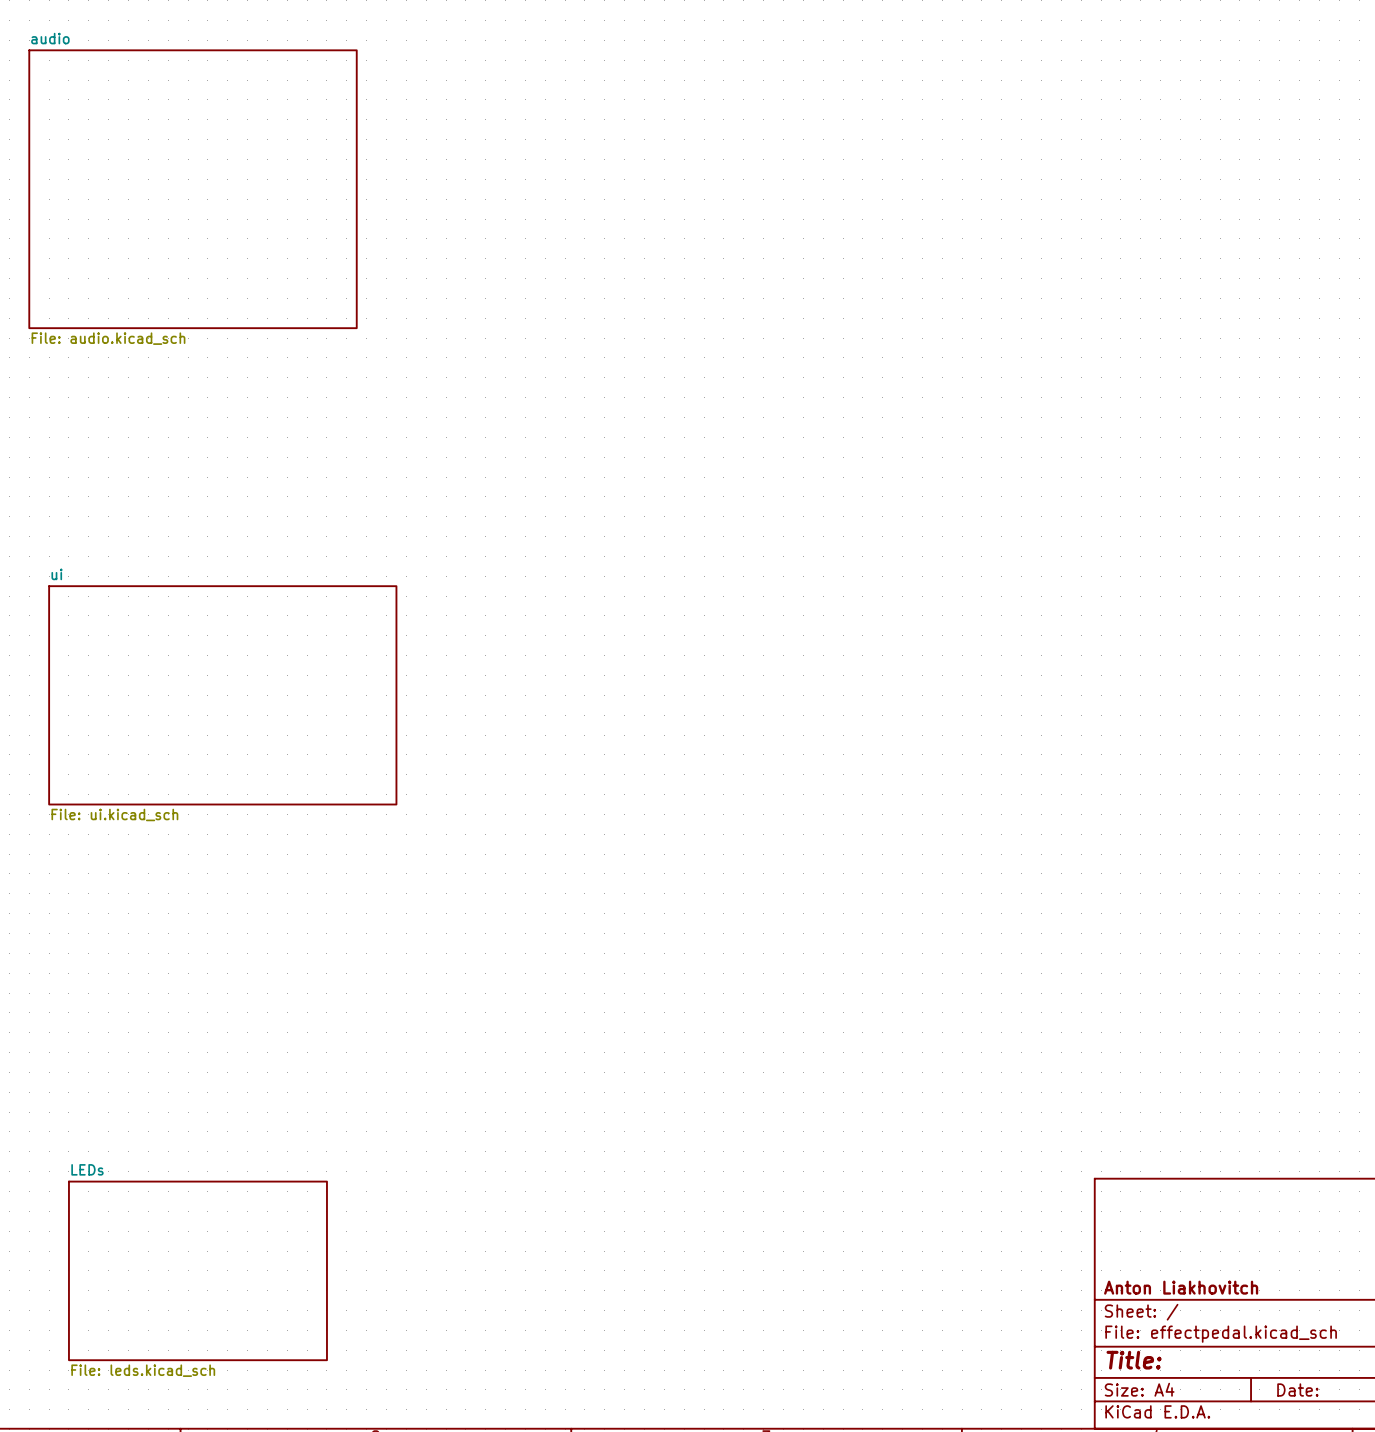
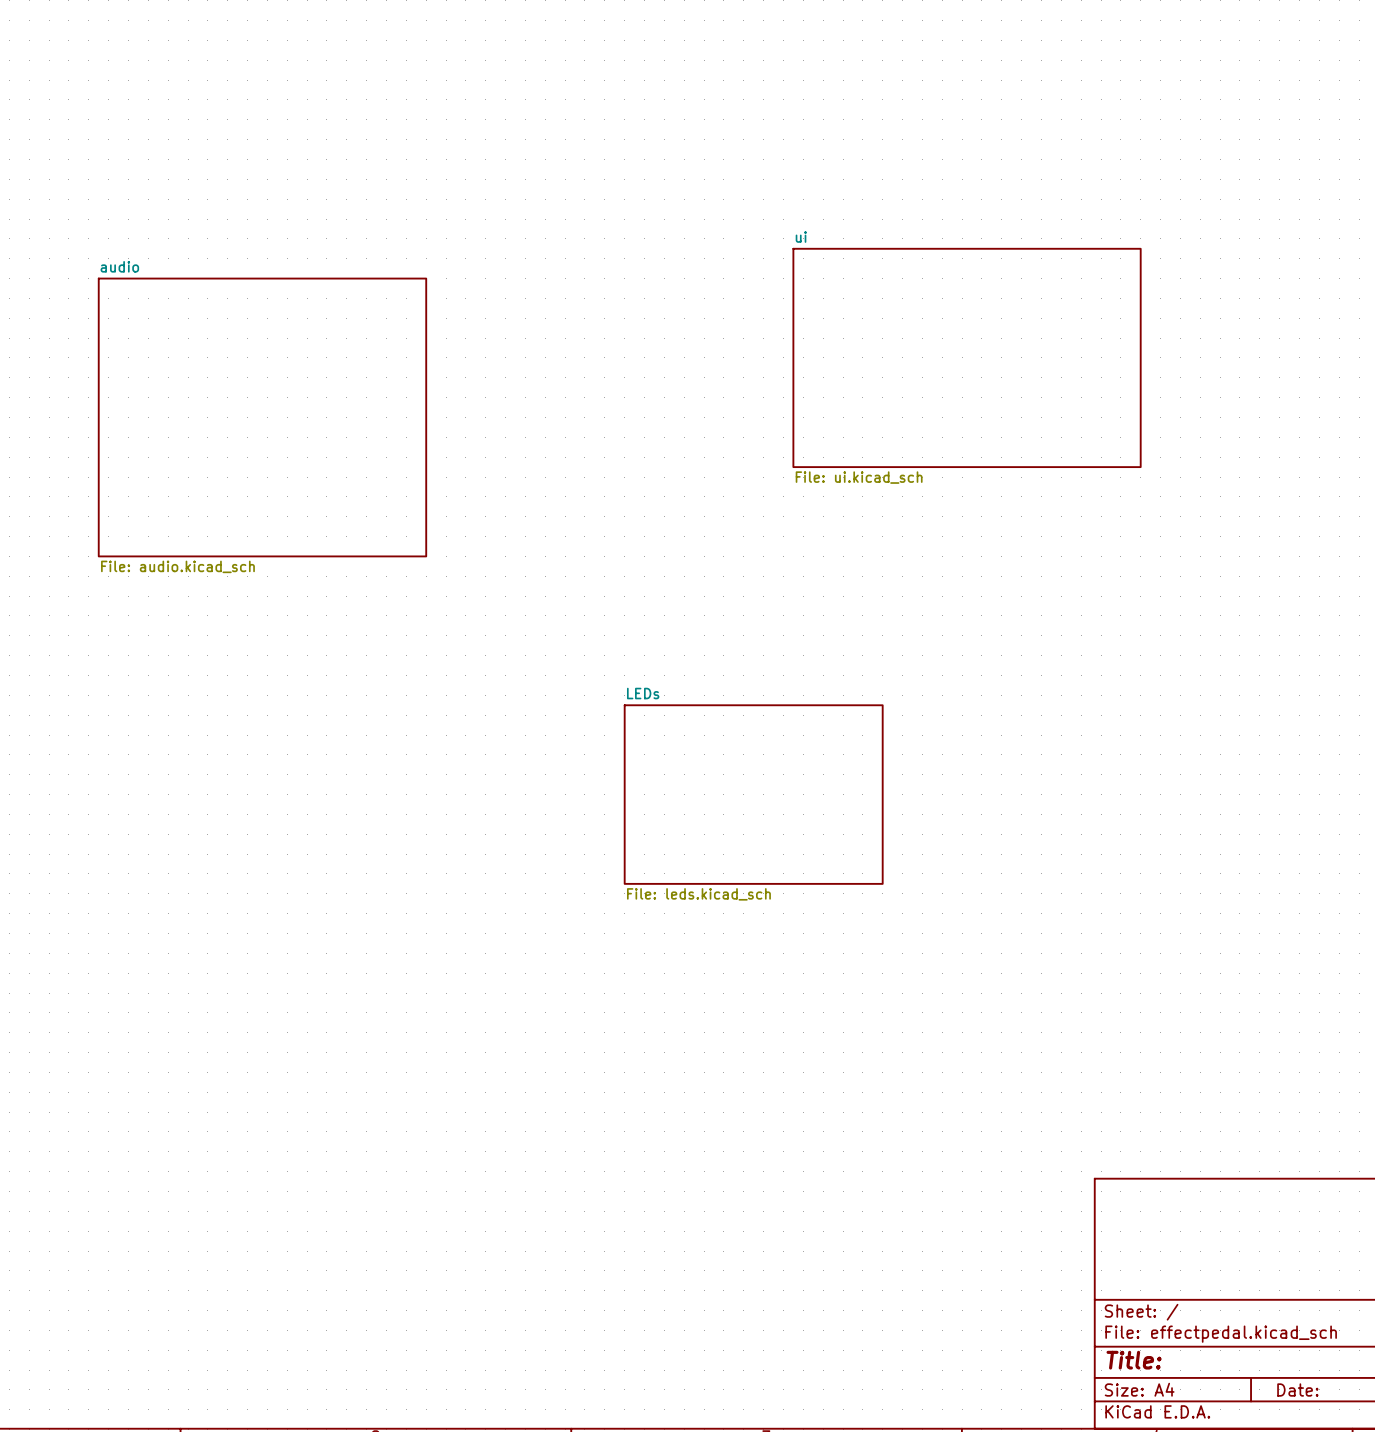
sheet audio: File: audio.kicad_sch (193, 189) -> none
sheet ui: none -> File: ui.kicad_sch (967, 357)
sheet audio: none -> File: audio.kicad_sch (262, 417)
sheet ui: File: ui.kicad_sch (222, 695) -> none
sheet LEDs: none -> File: leds.kicad_sch (753, 794)
sheet LEDs: File: leds.kicad_sch (197, 1270) -> none
title block: Anton Liakhovitch (1181, 1287) -> none

